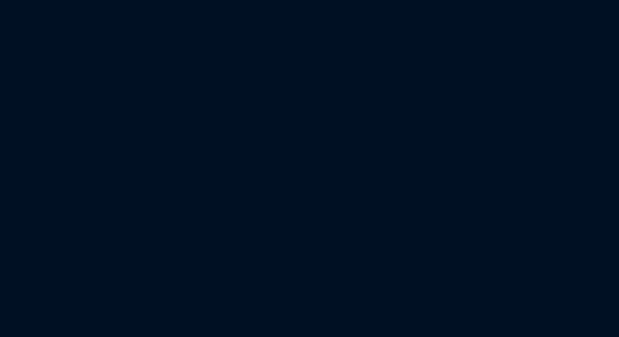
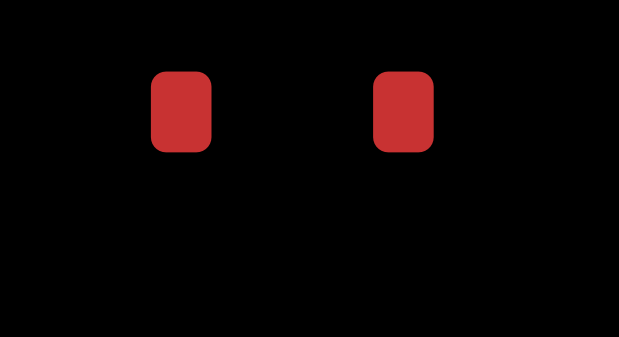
part: none -> (292, 111)

